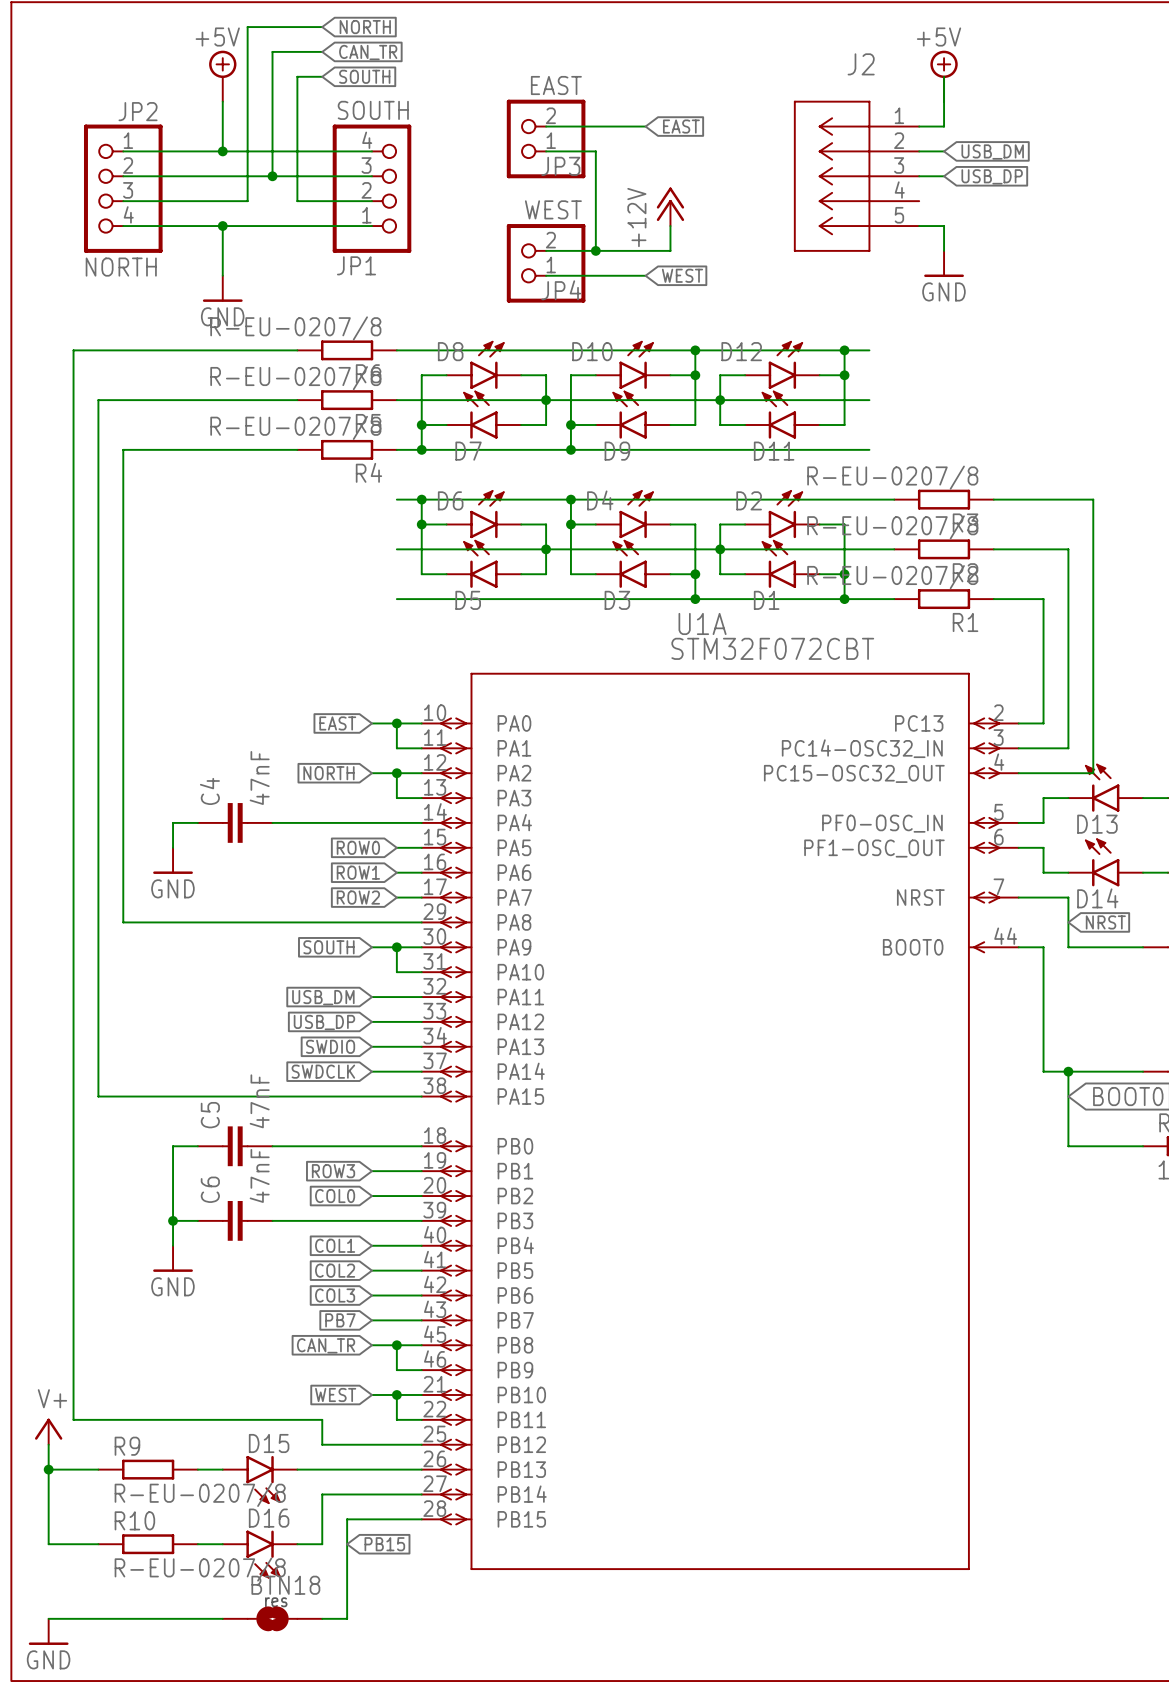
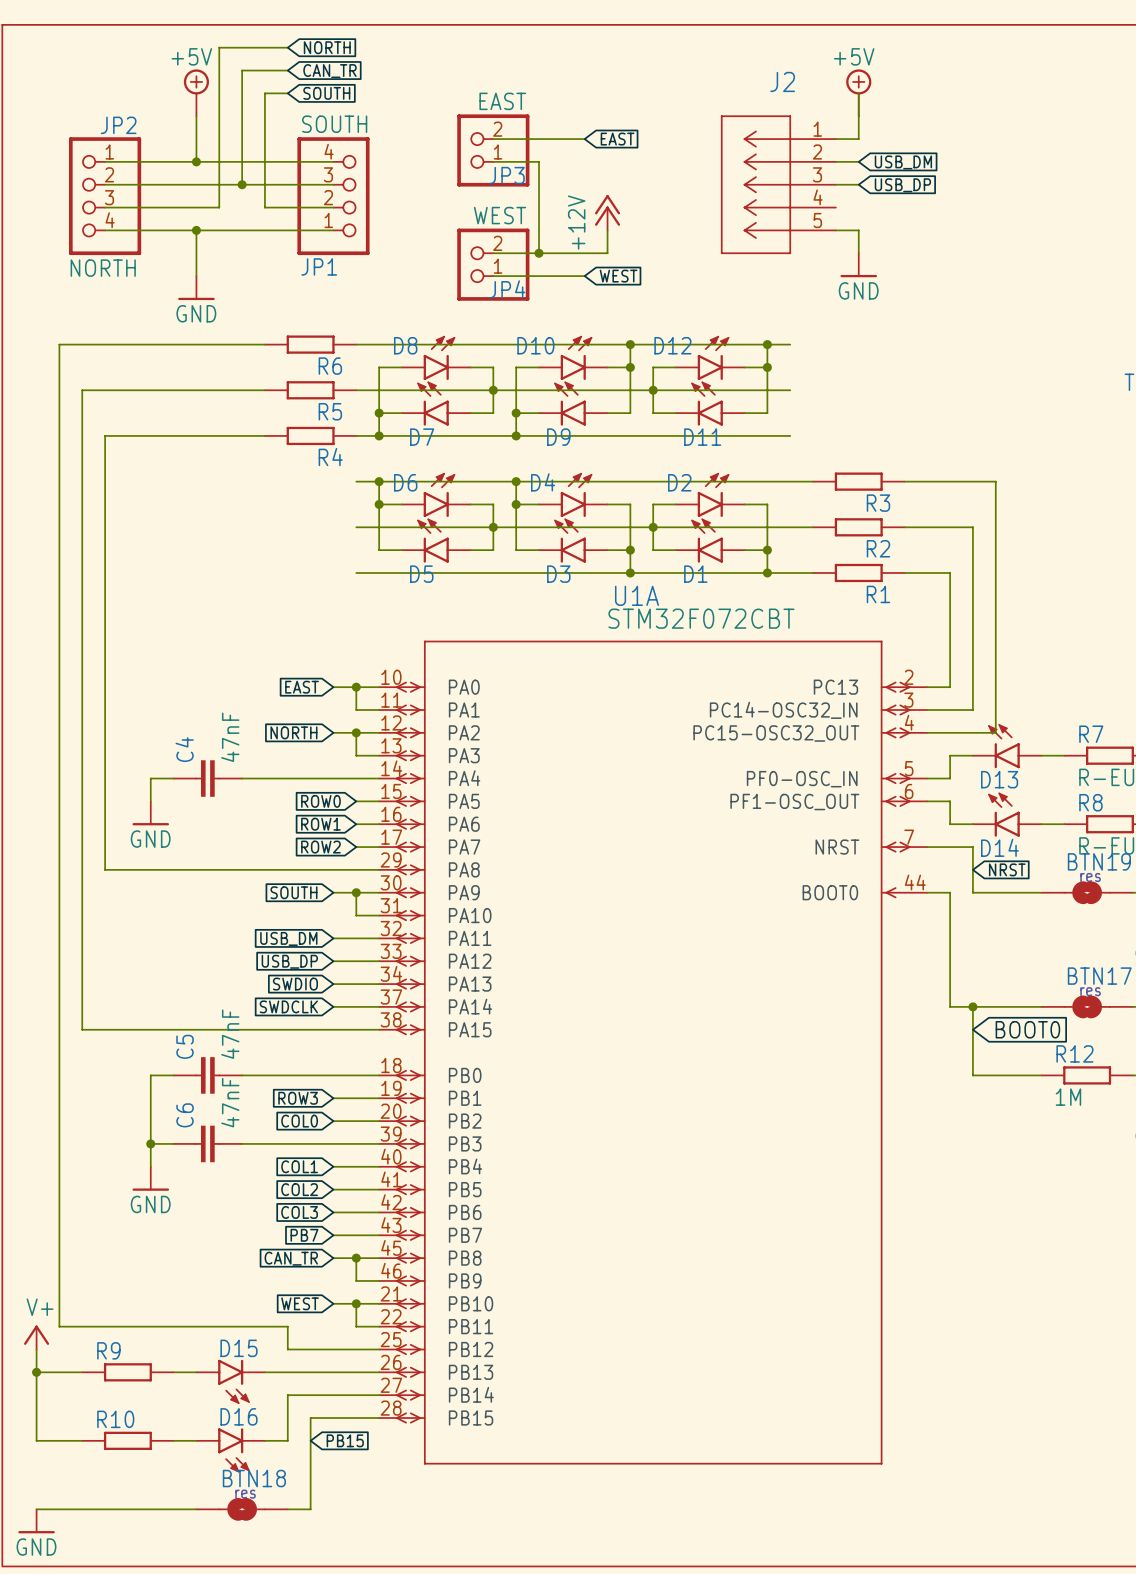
R6 value: R-EU-0207/8 (295, 328) -> none
R5 value: R-EU-0207/8 (295, 378) -> none
R4 value: R-EU-0207/8 (295, 427) -> none
R3 value: R-EU-0207/8 (892, 477) -> none
R2 value: R-EU-0207/8 (892, 527) -> none
R1 value: R-EU-0207/8 (892, 577) -> none
R9 value: R-EU-0207/8 (200, 1494) -> none
R10 value: R-EU-0207/8 (200, 1569) -> none

